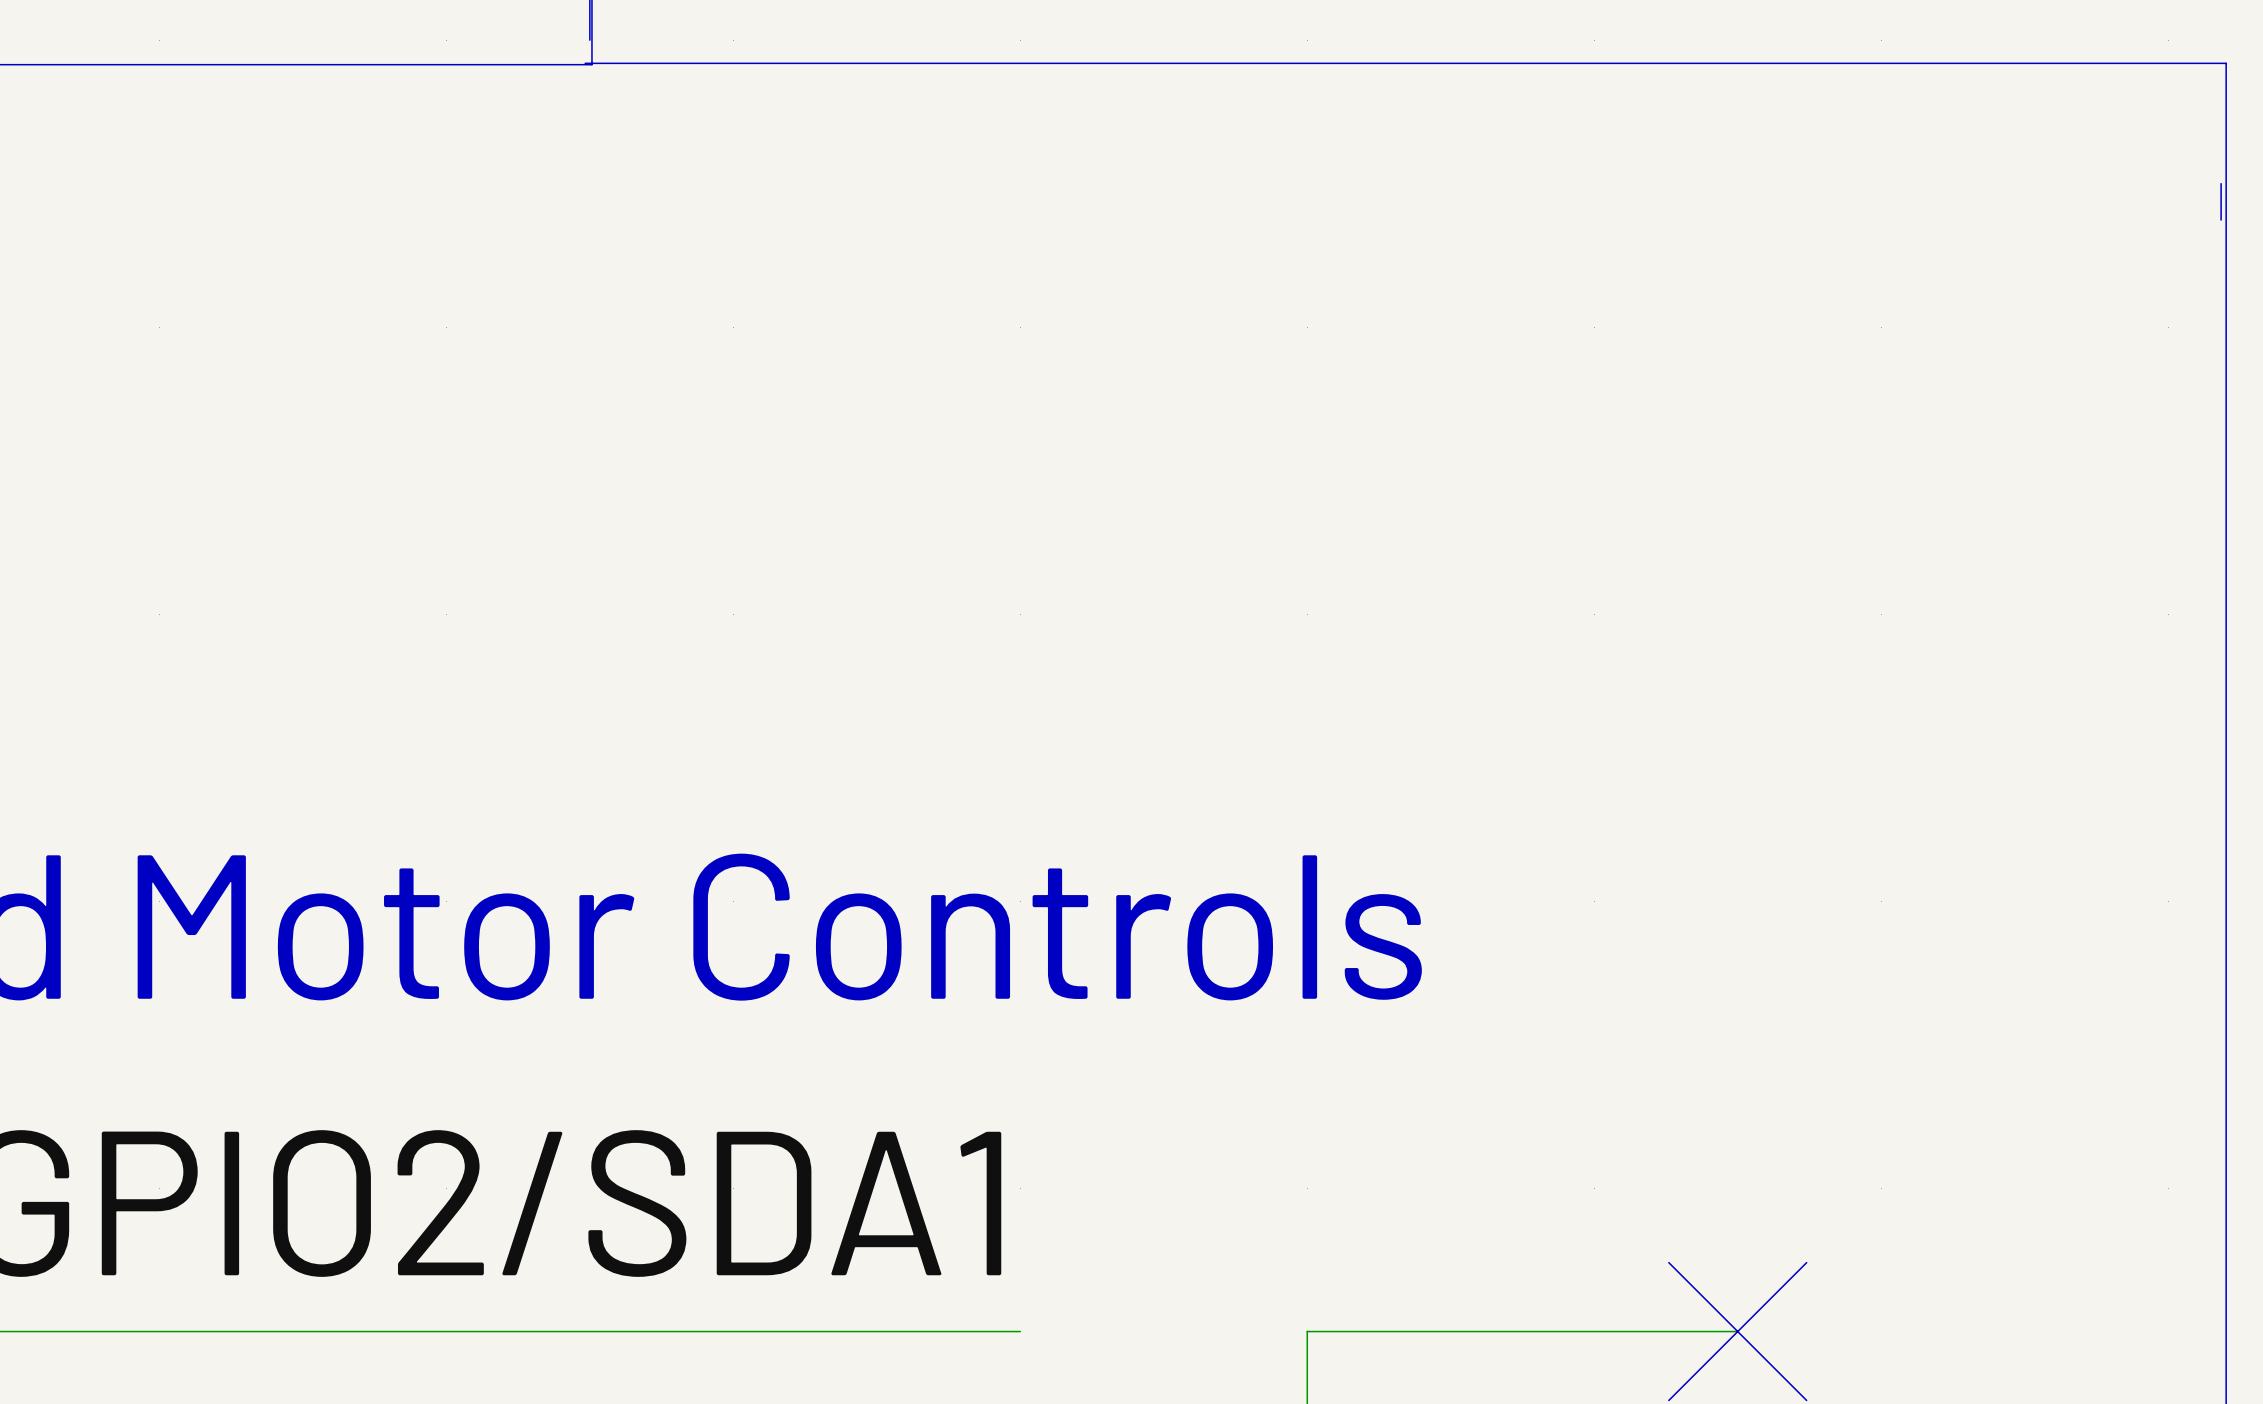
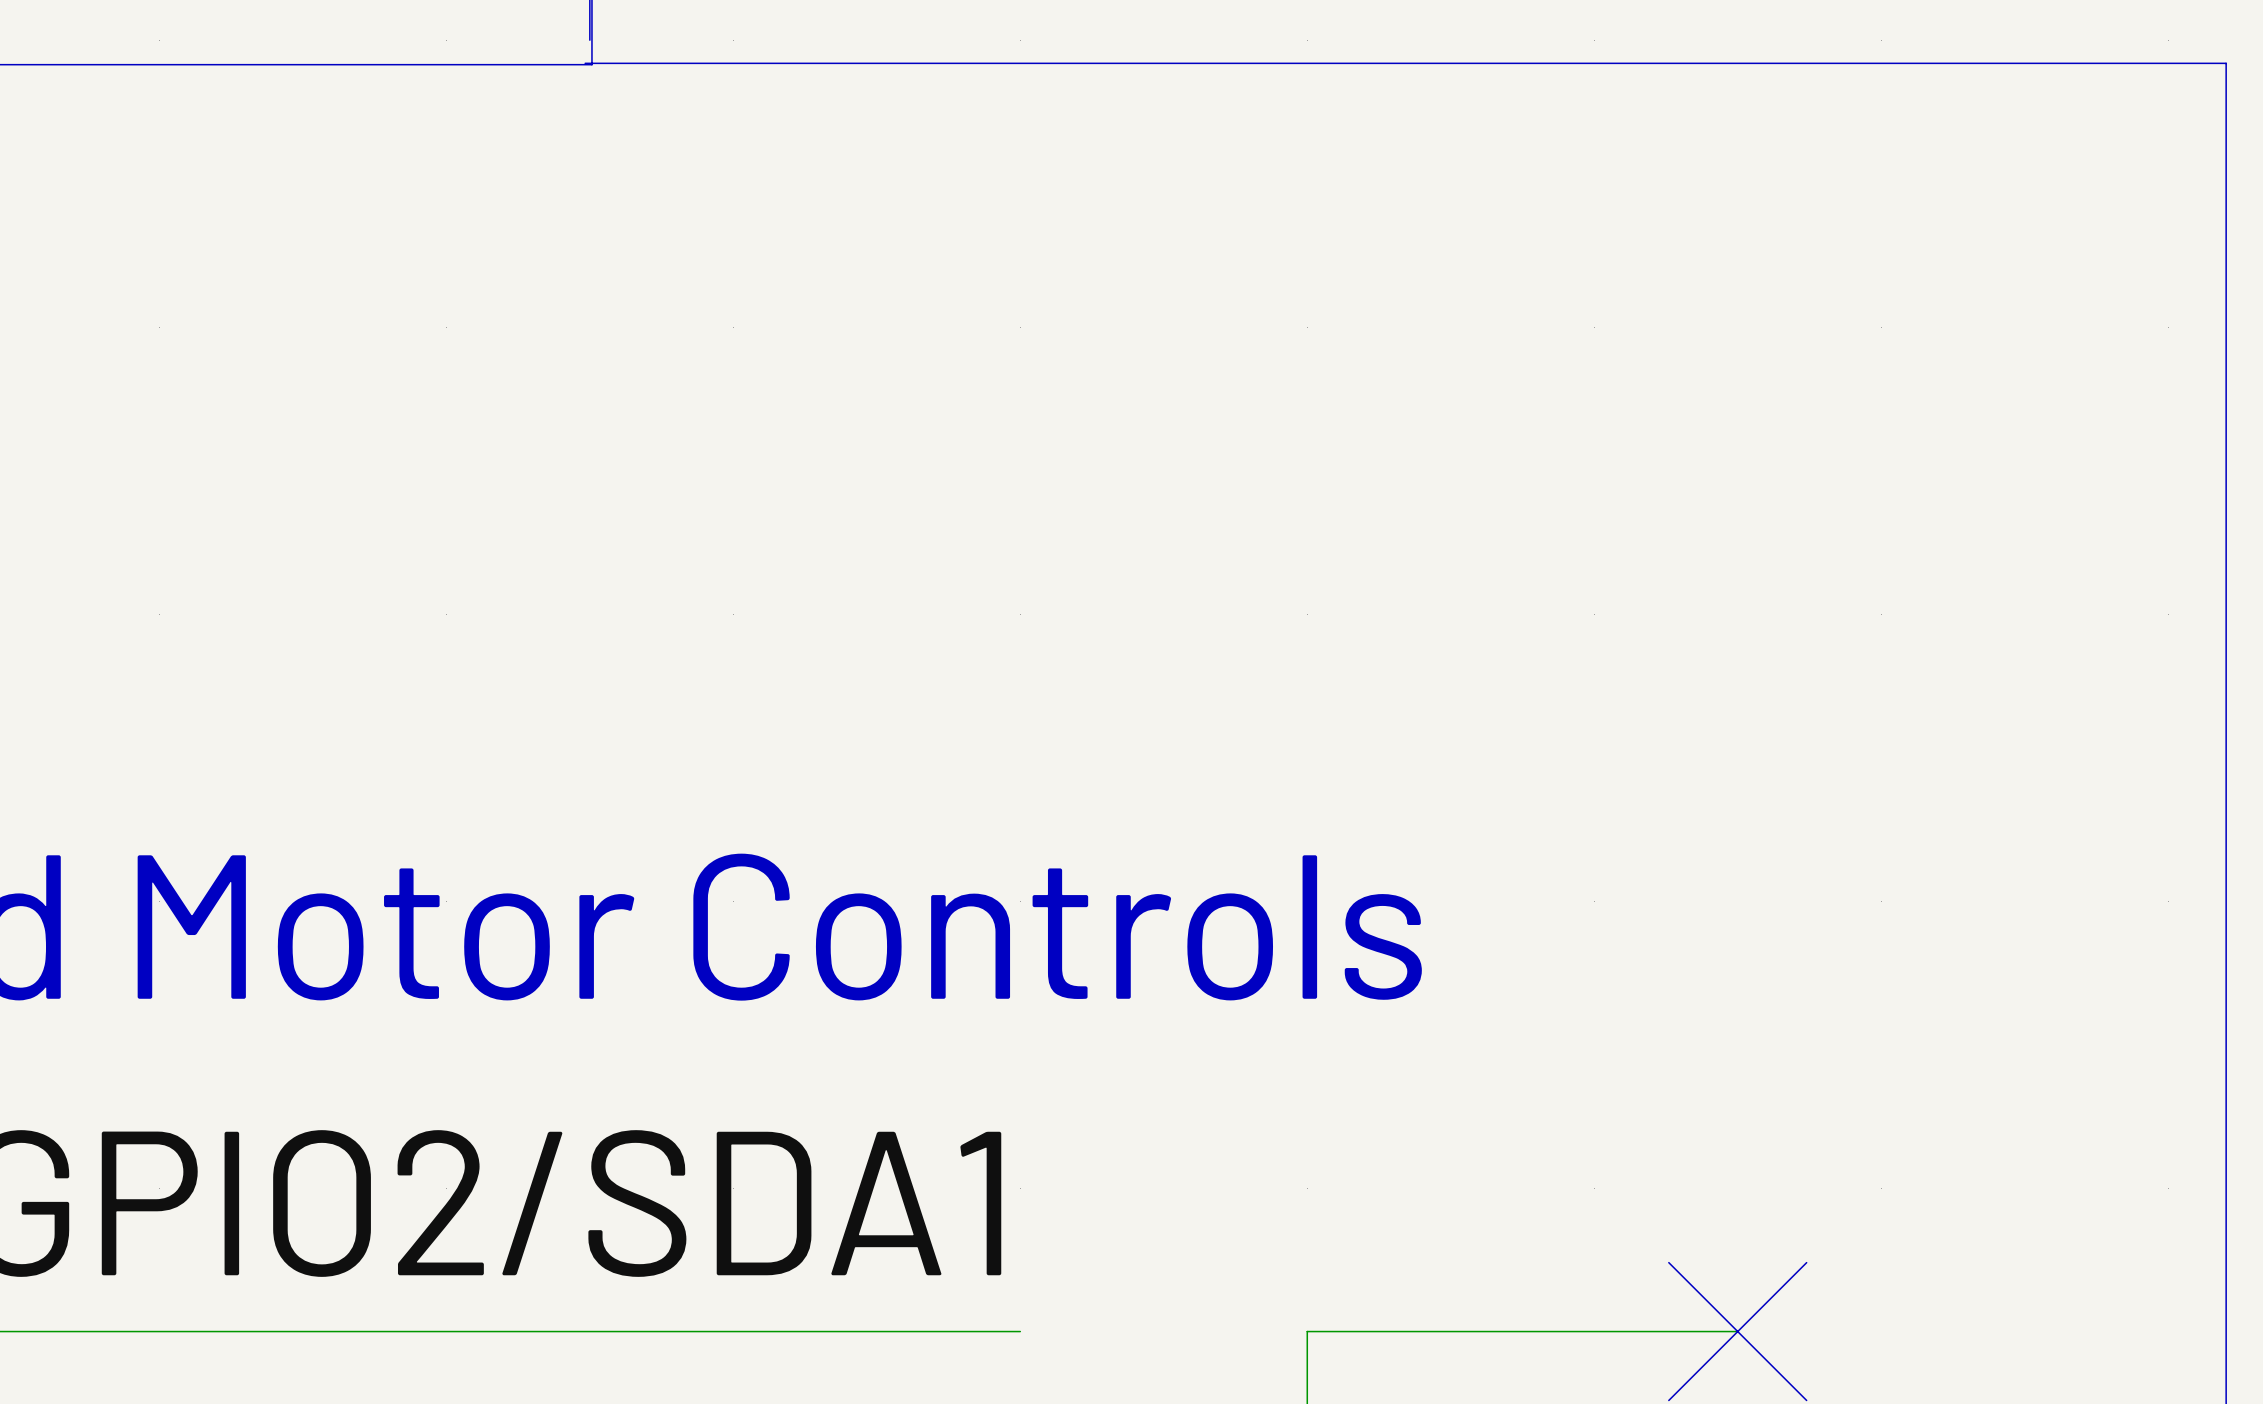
line: (2221, 183) (2221, 220) -> none

